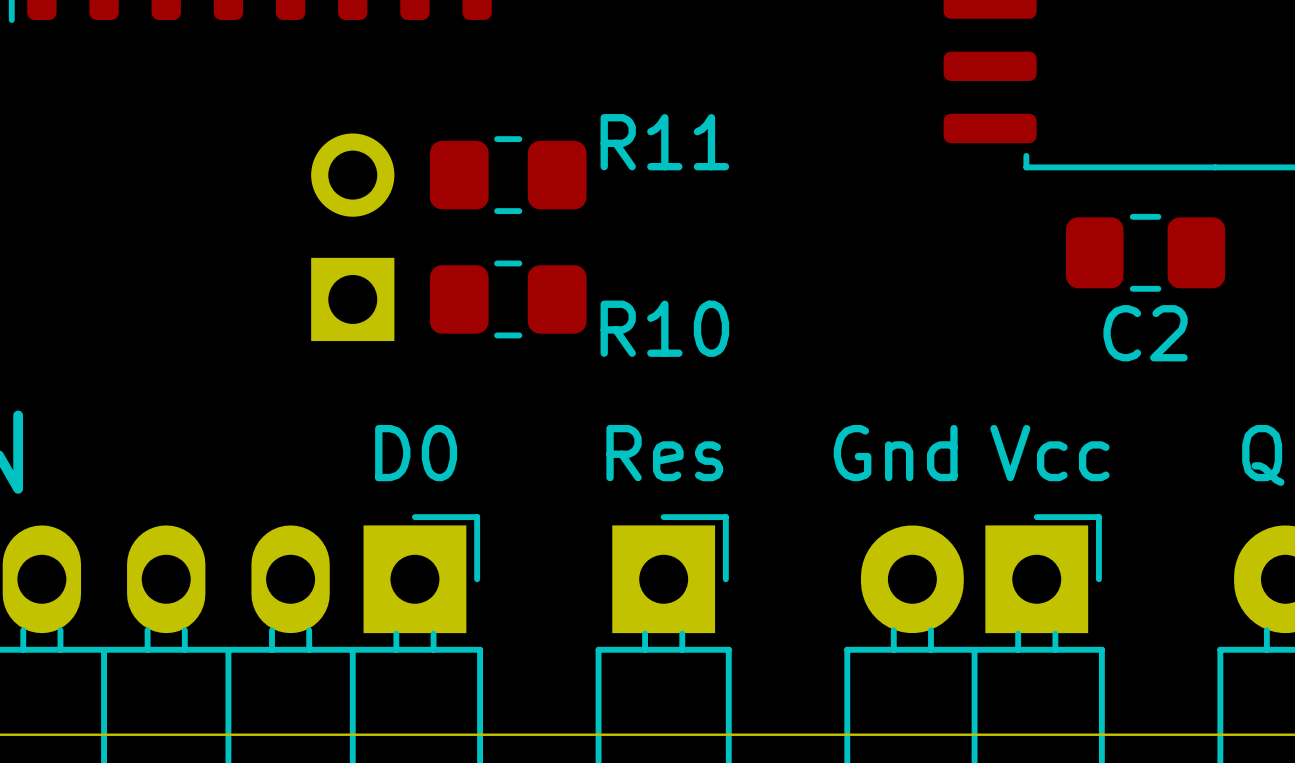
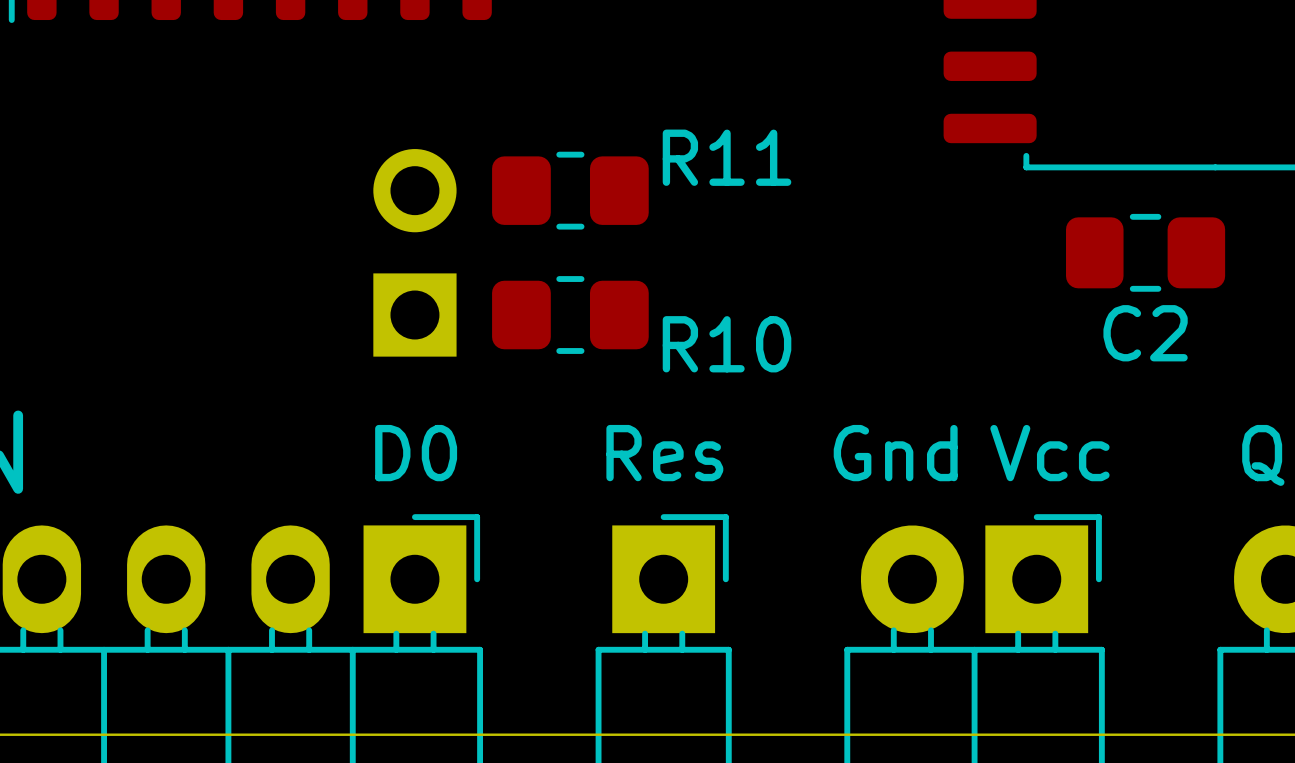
R11 position: (508, 175) -> (570, 190)
part position: (352, 237) -> (414, 252)
R10 position: (508, 299) -> (570, 315)

